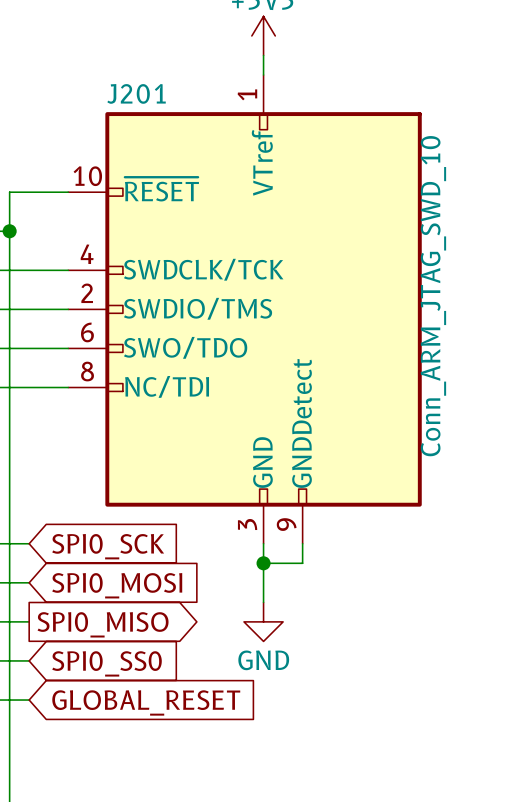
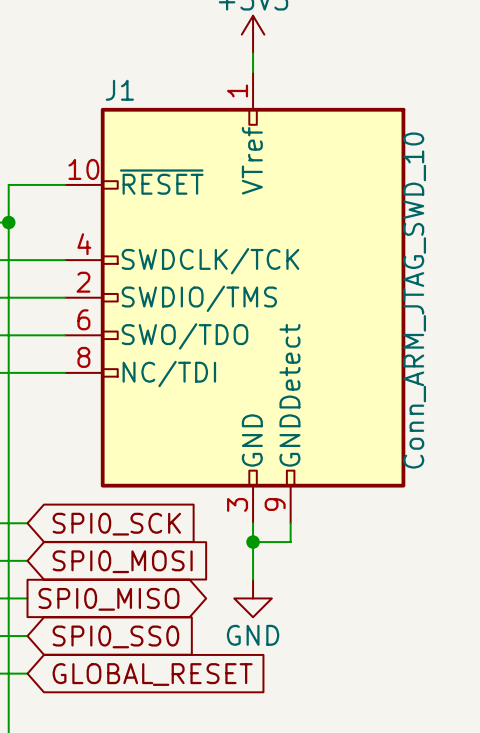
J201 name: J201 (136, 93) -> J1 (119, 90)

